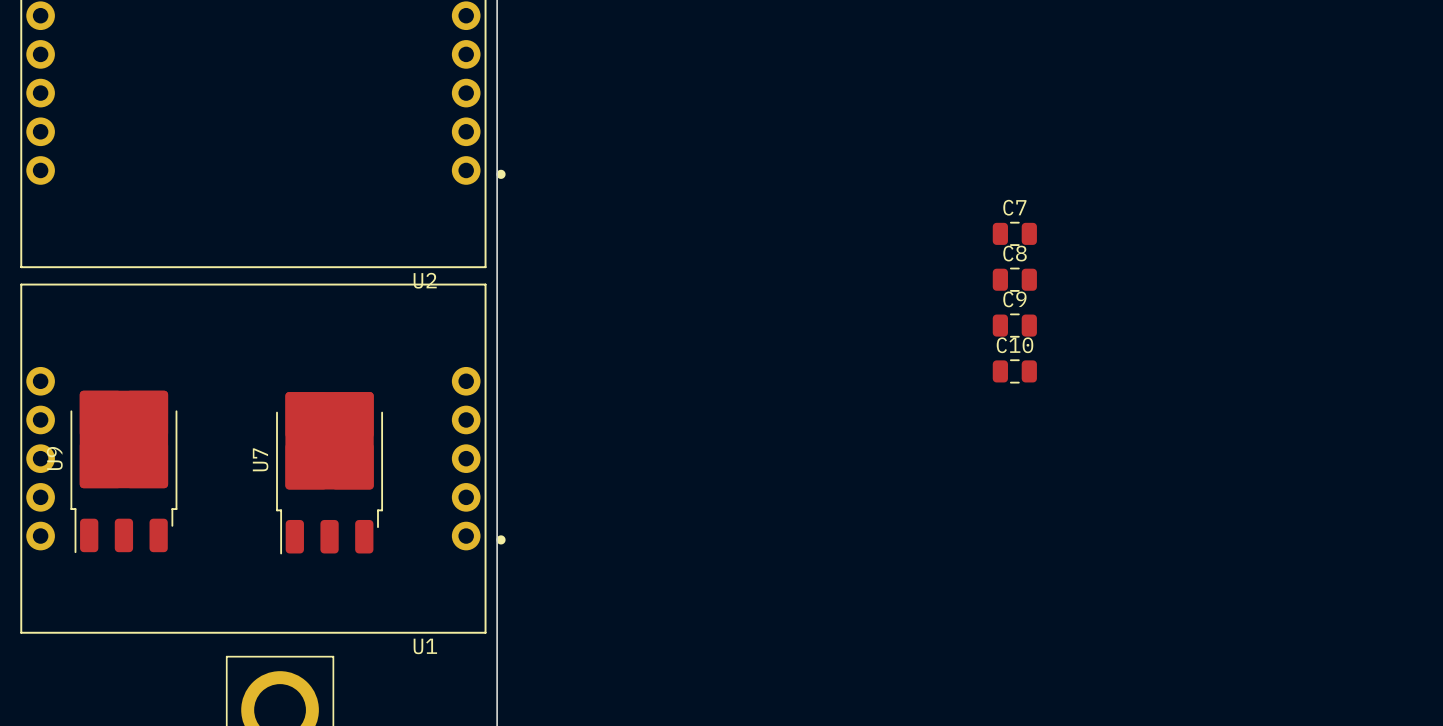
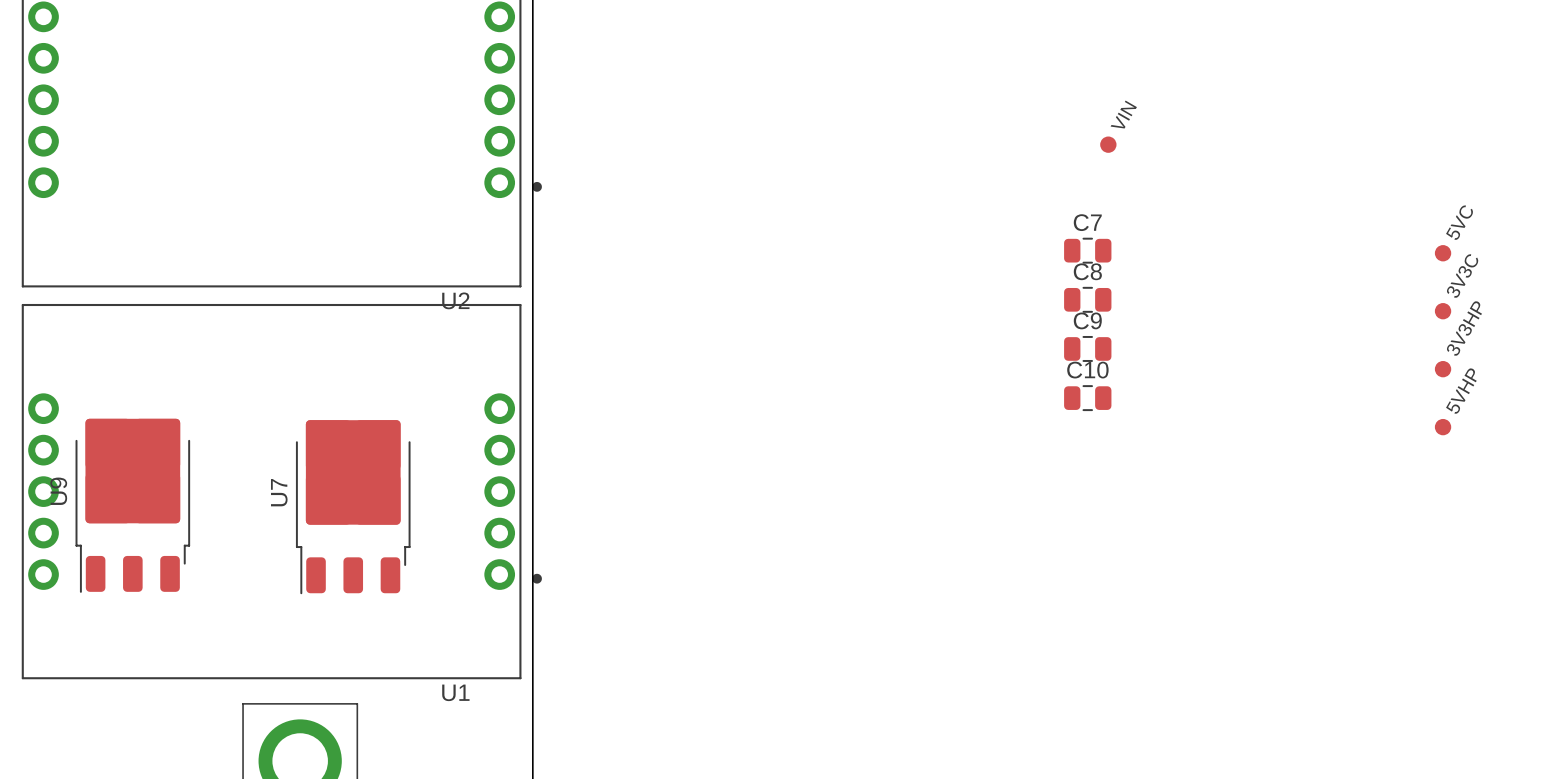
part: none -> VIN (1108, 144)
part: none -> 5VC (1443, 253)
part: none -> 3V3C (1443, 311)
part: none -> 3V3HP (1443, 369)
part: none -> 5VHP (1443, 427)

